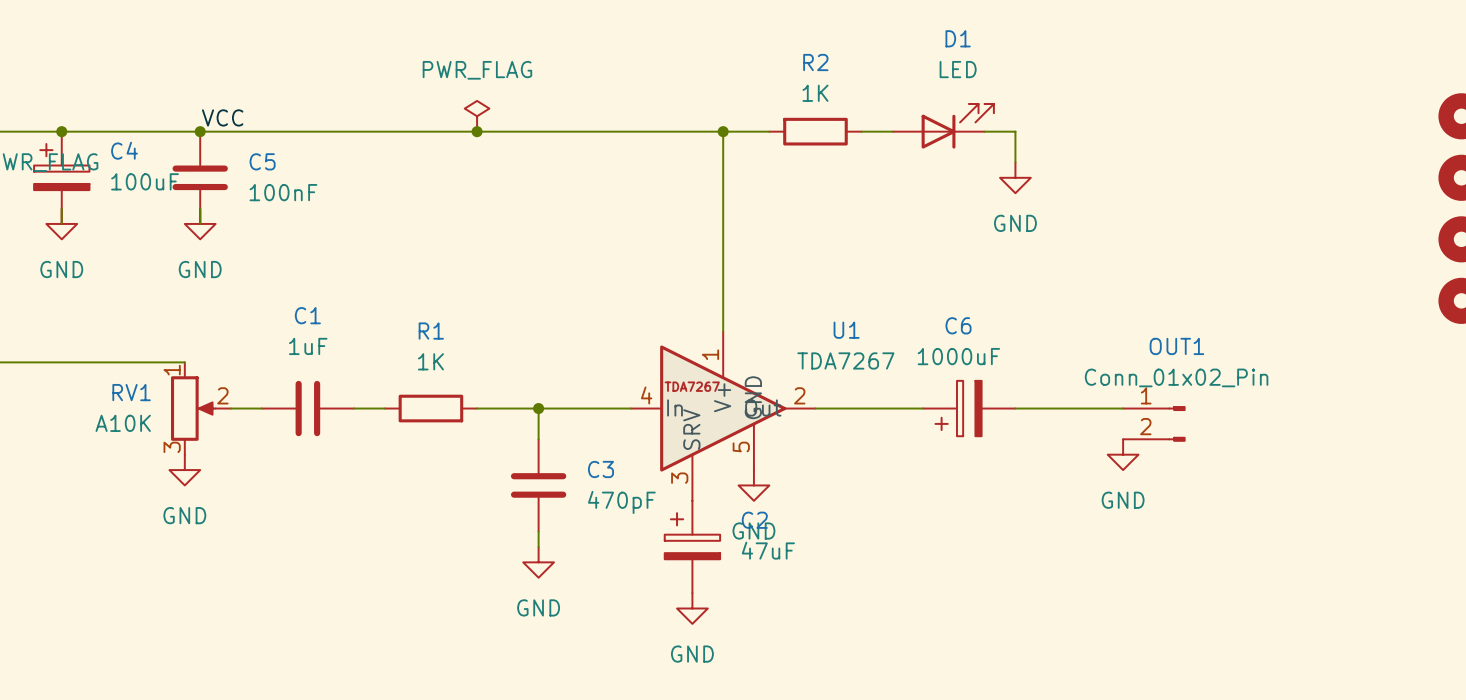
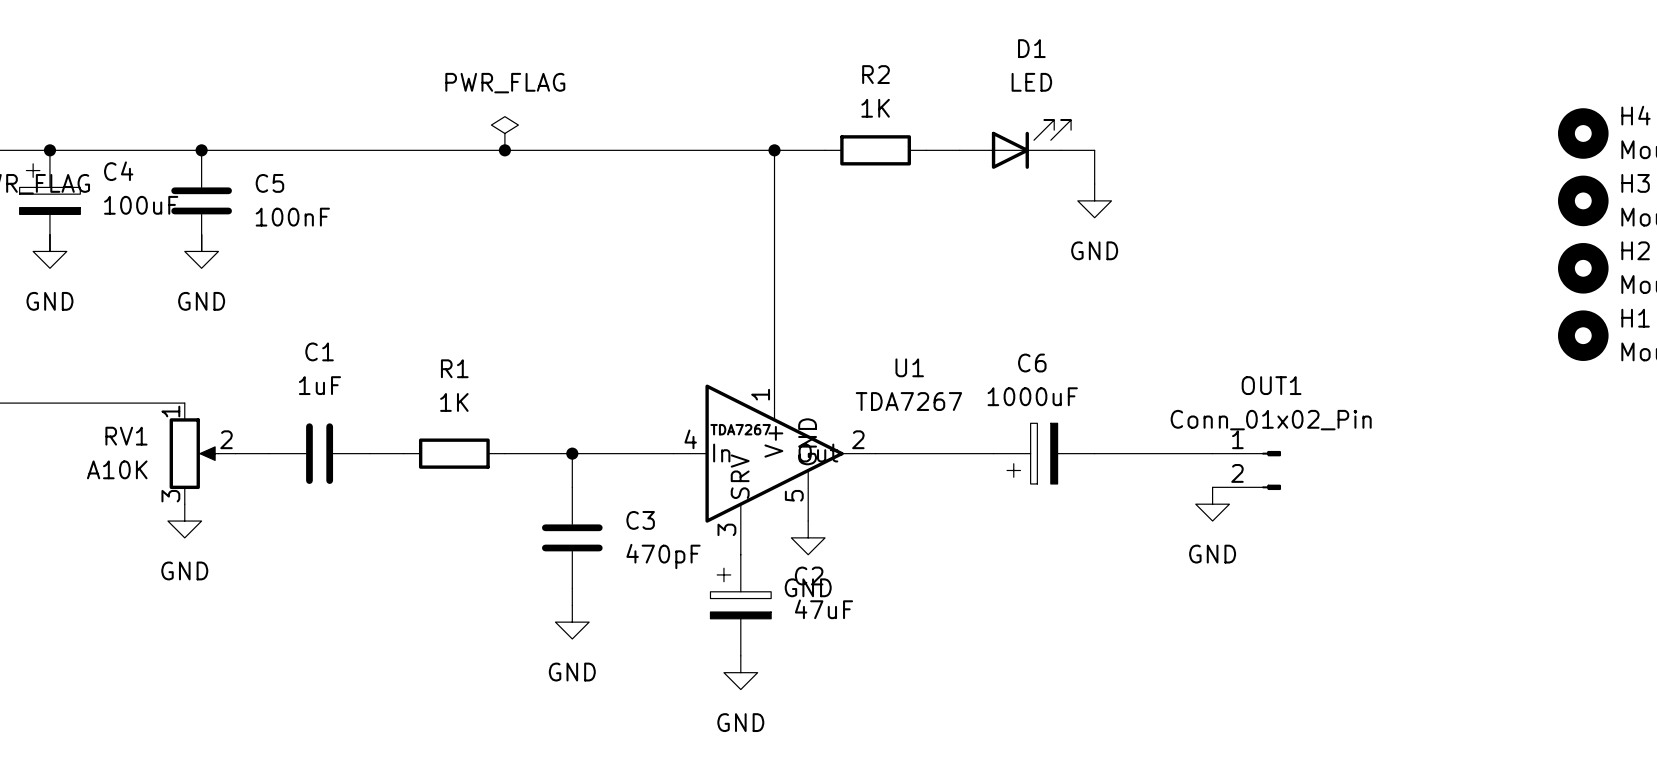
label: VCC (222, 117) -> none

